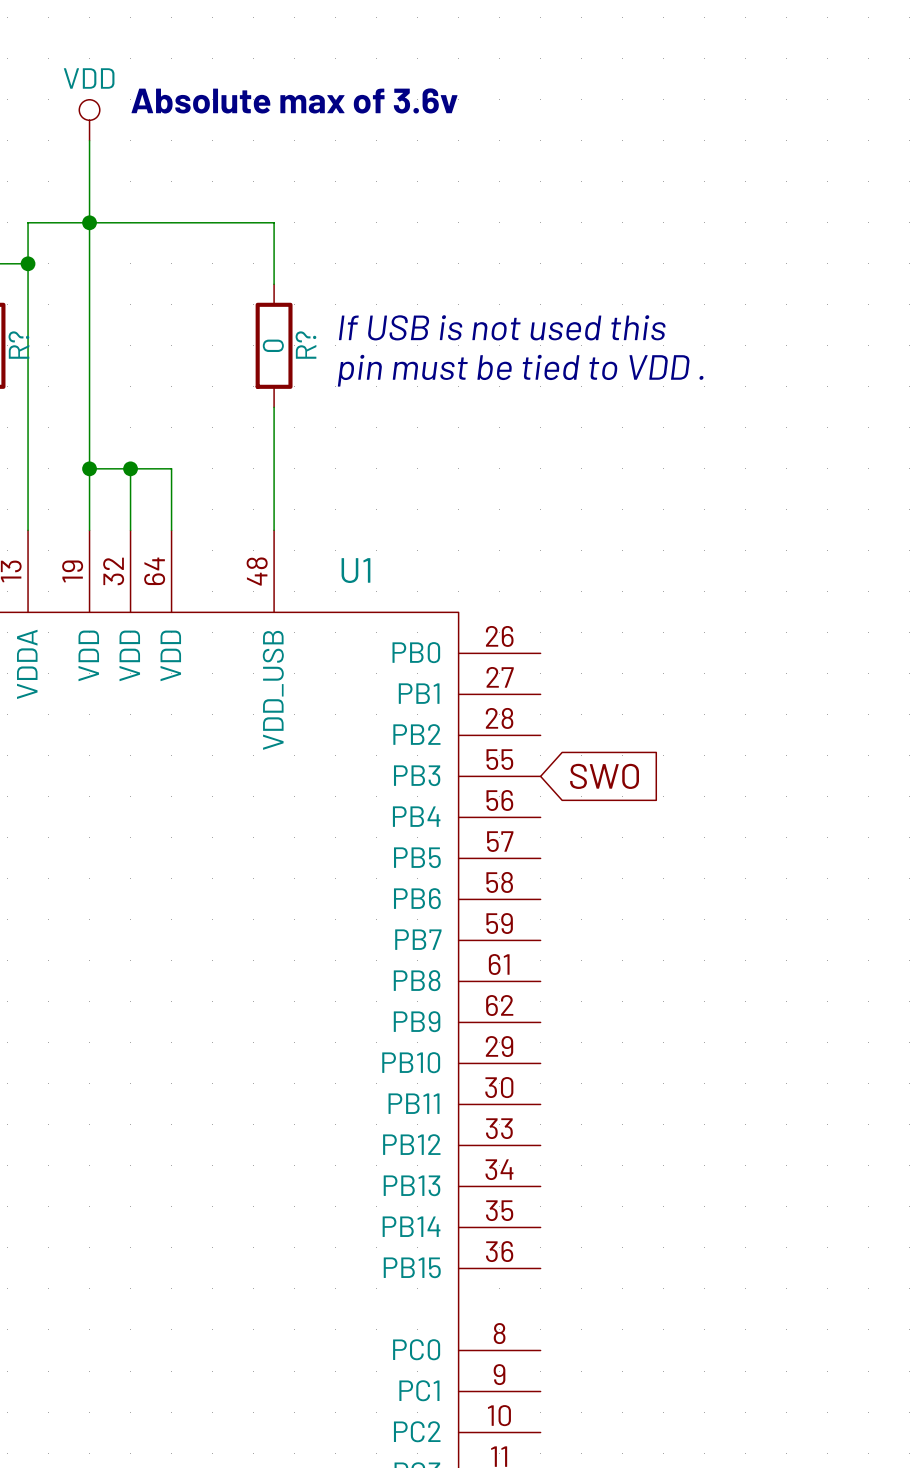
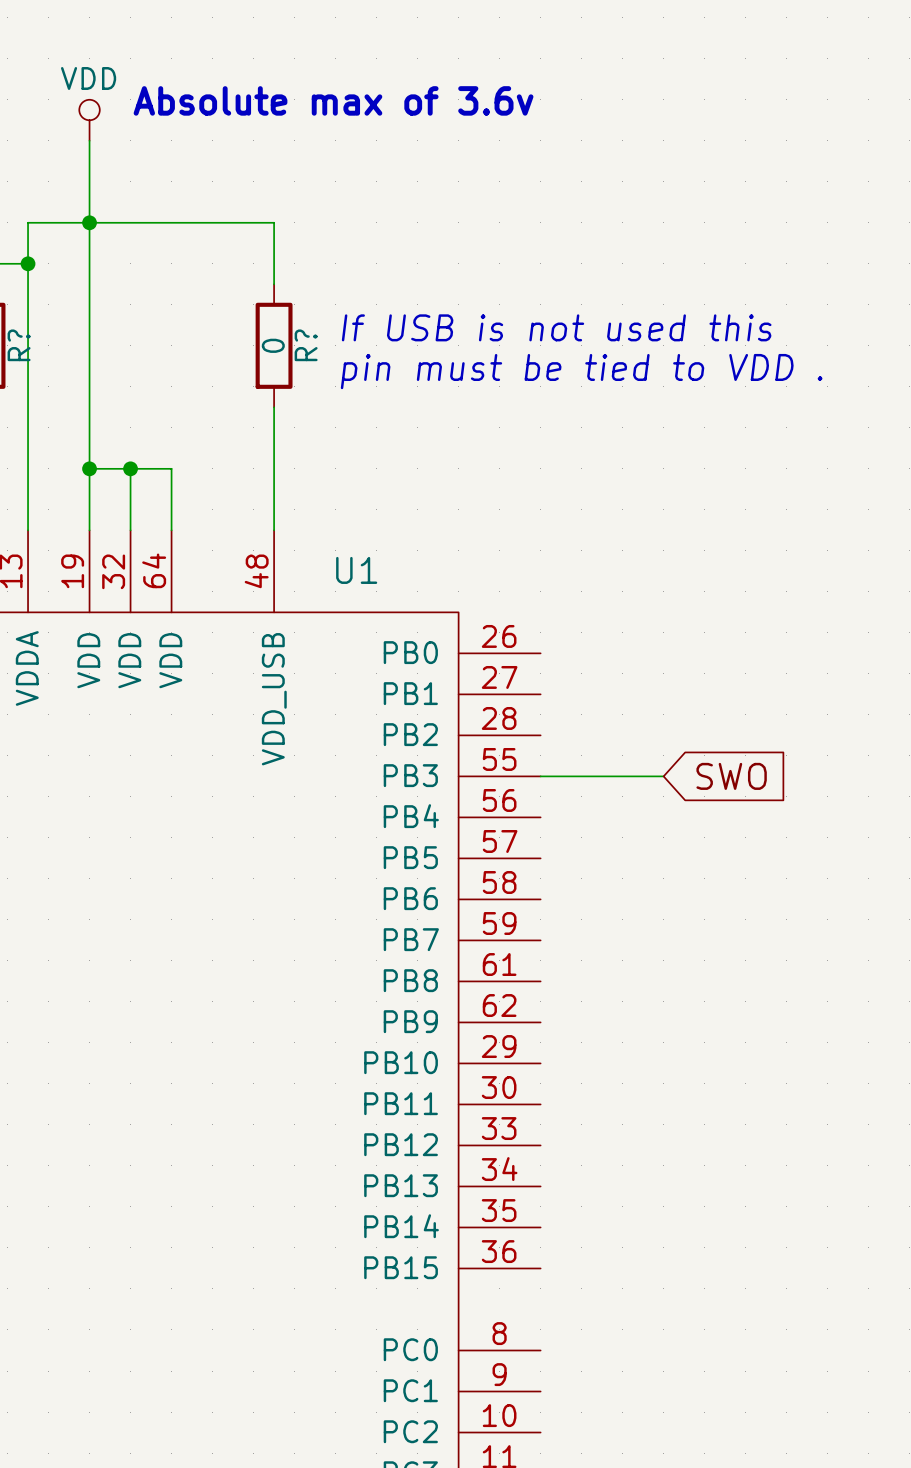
wire: none -> (540, 776) (663, 776)
global label position: SWO (604, 776) -> SWO (731, 776)

